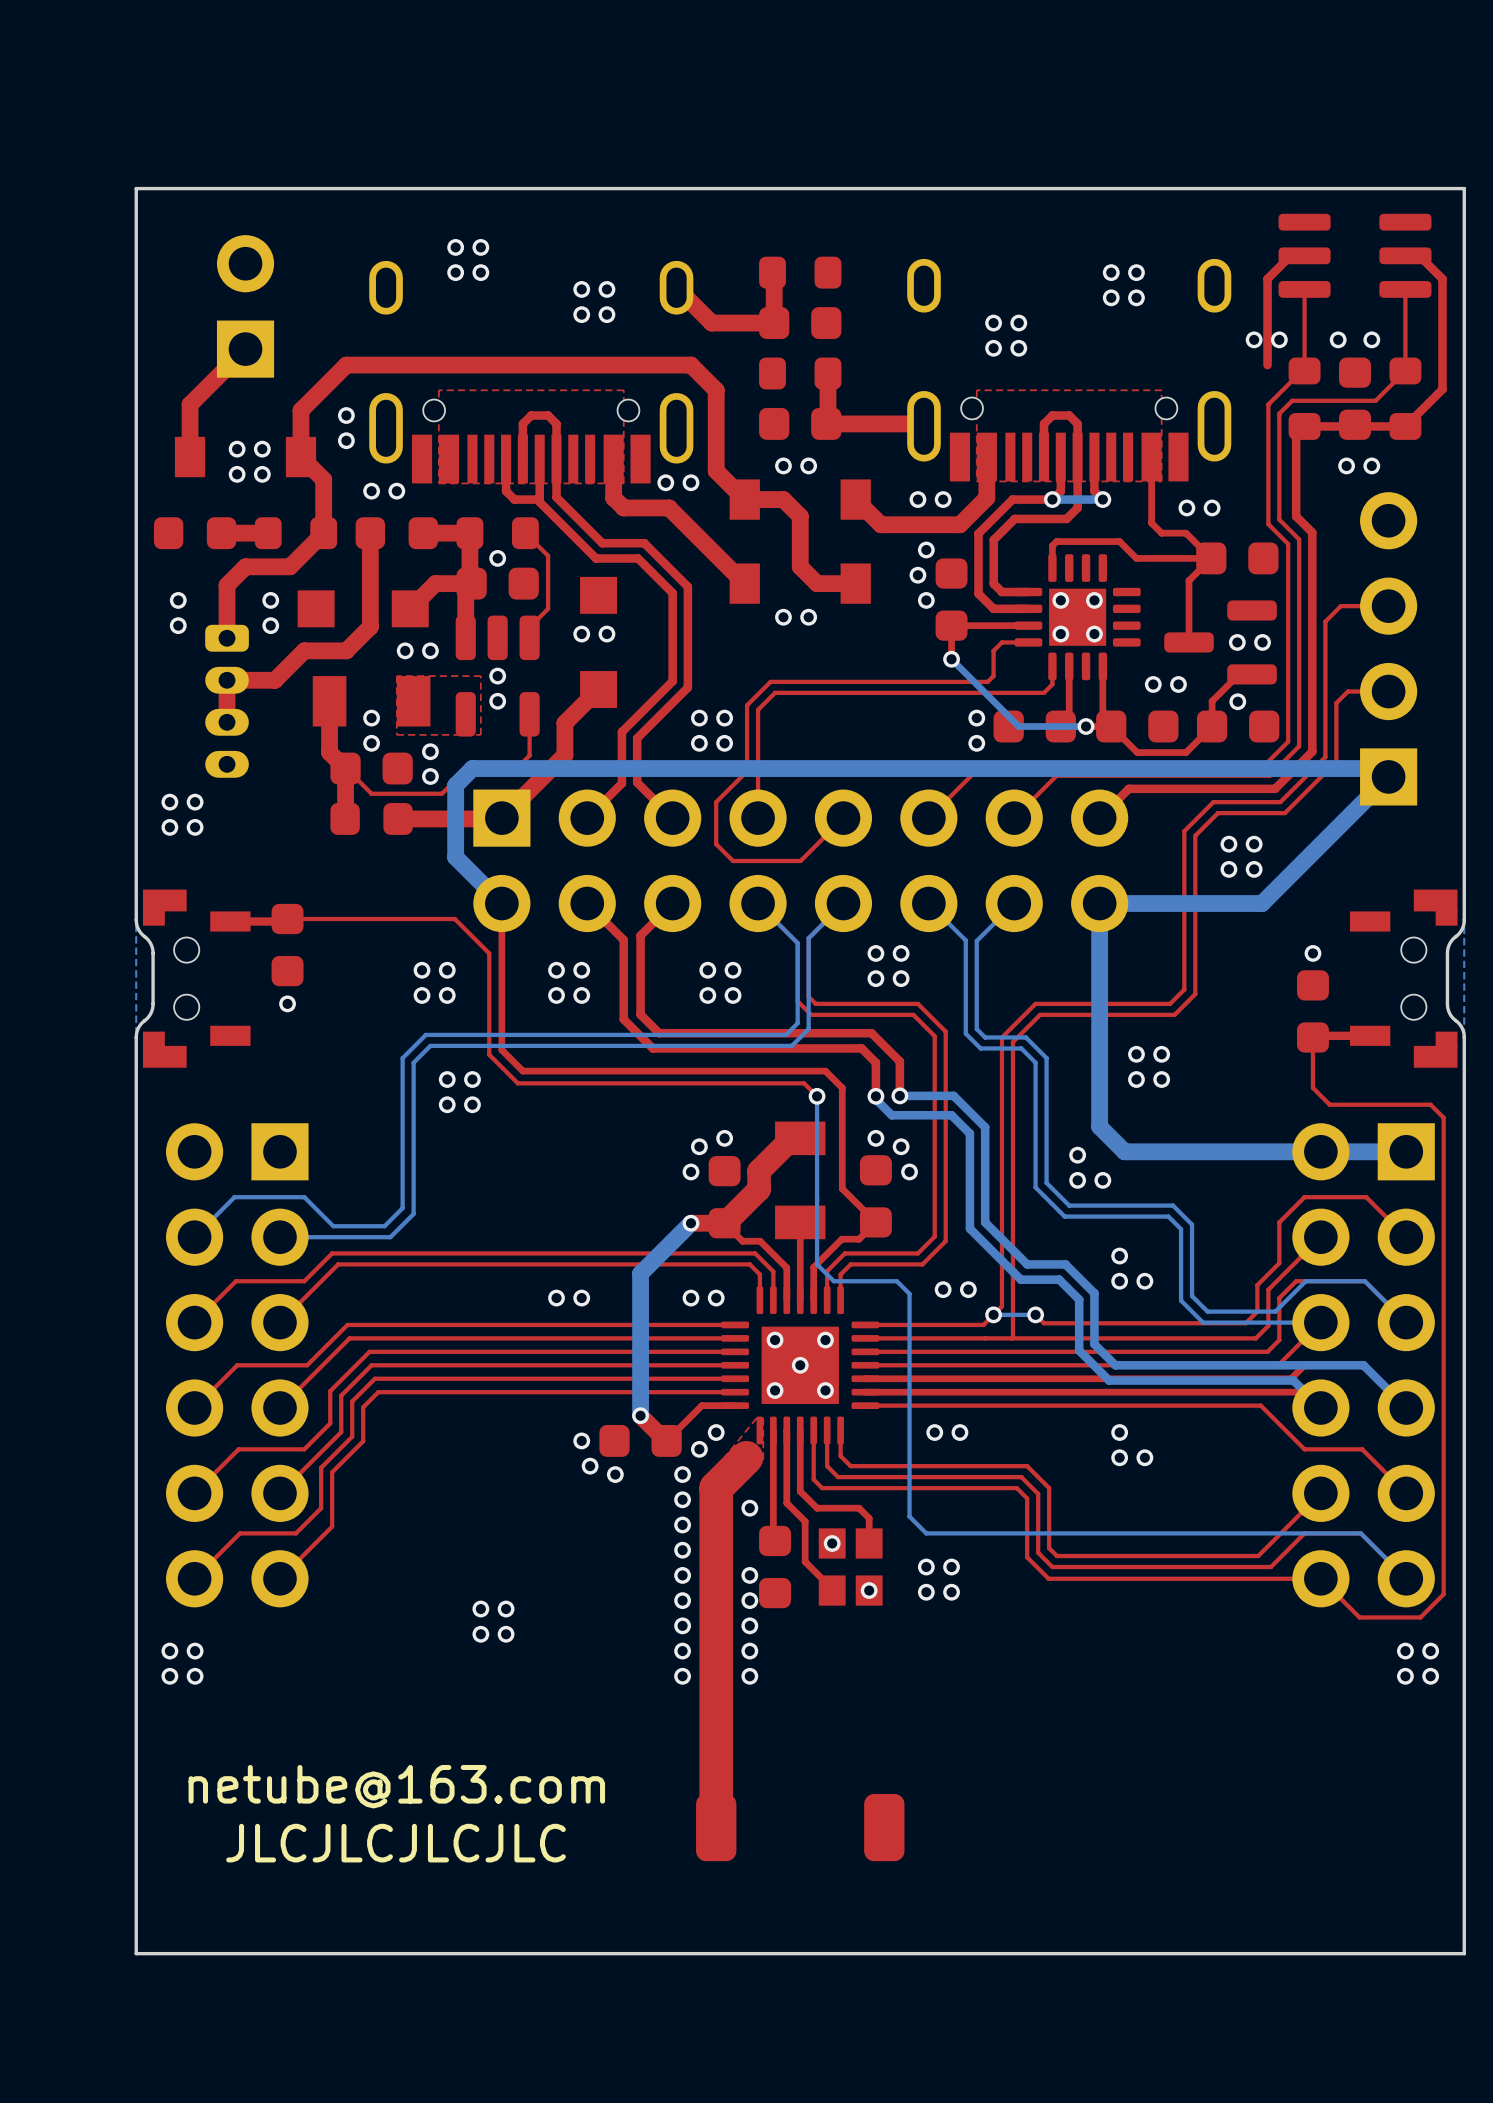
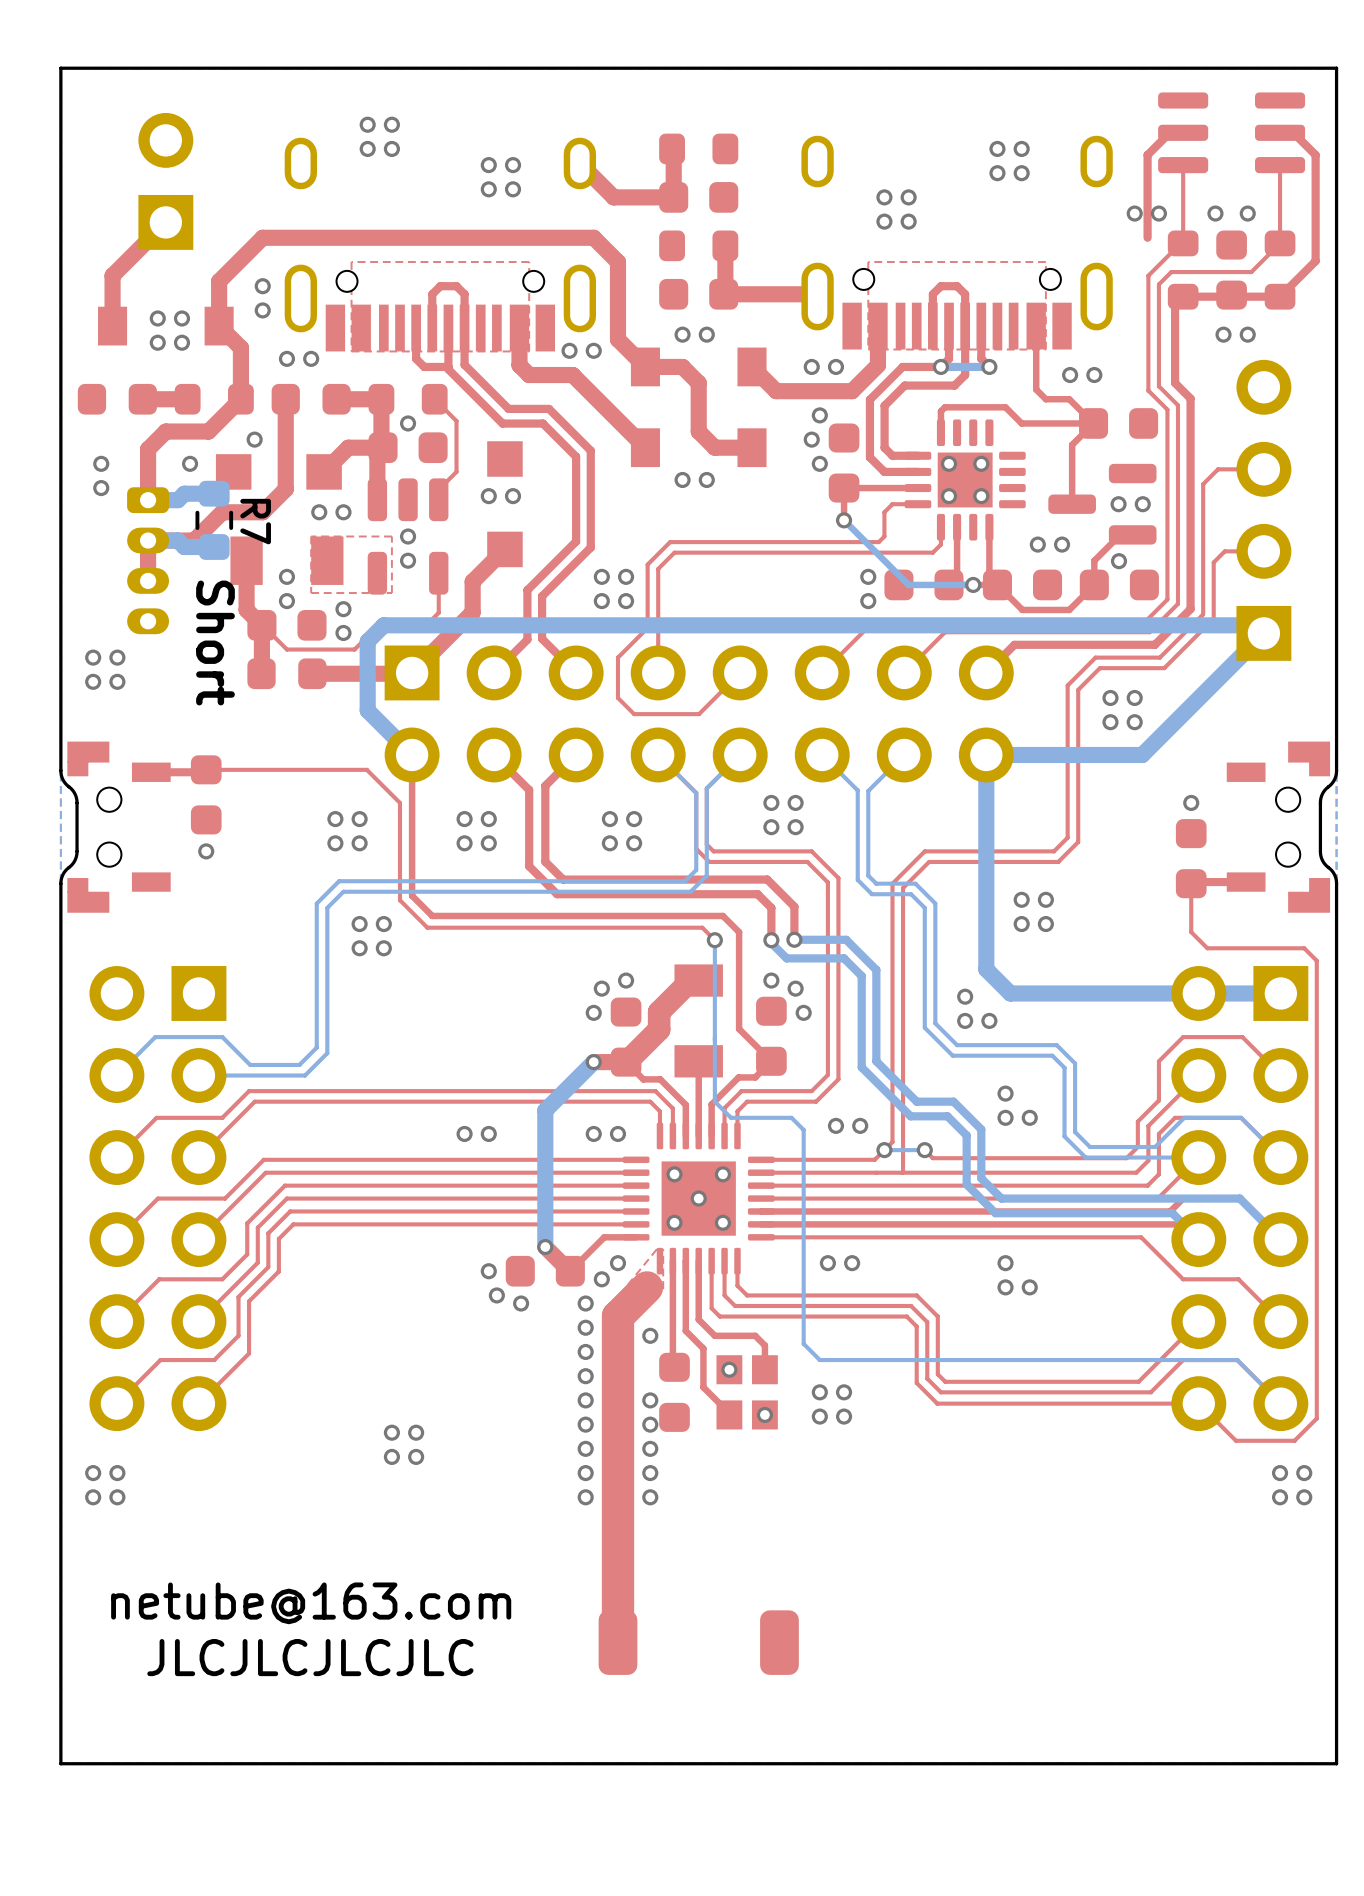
via position: (270, 625) -> (254, 439)
bottom track: none -> (214, 493) (184, 493) (177, 500) (148, 500)
R7: none -> (214, 520)
bottom track: none -> (148, 540) (177, 540) (184, 546) (214, 546)
text: none -> Short (215, 643)

